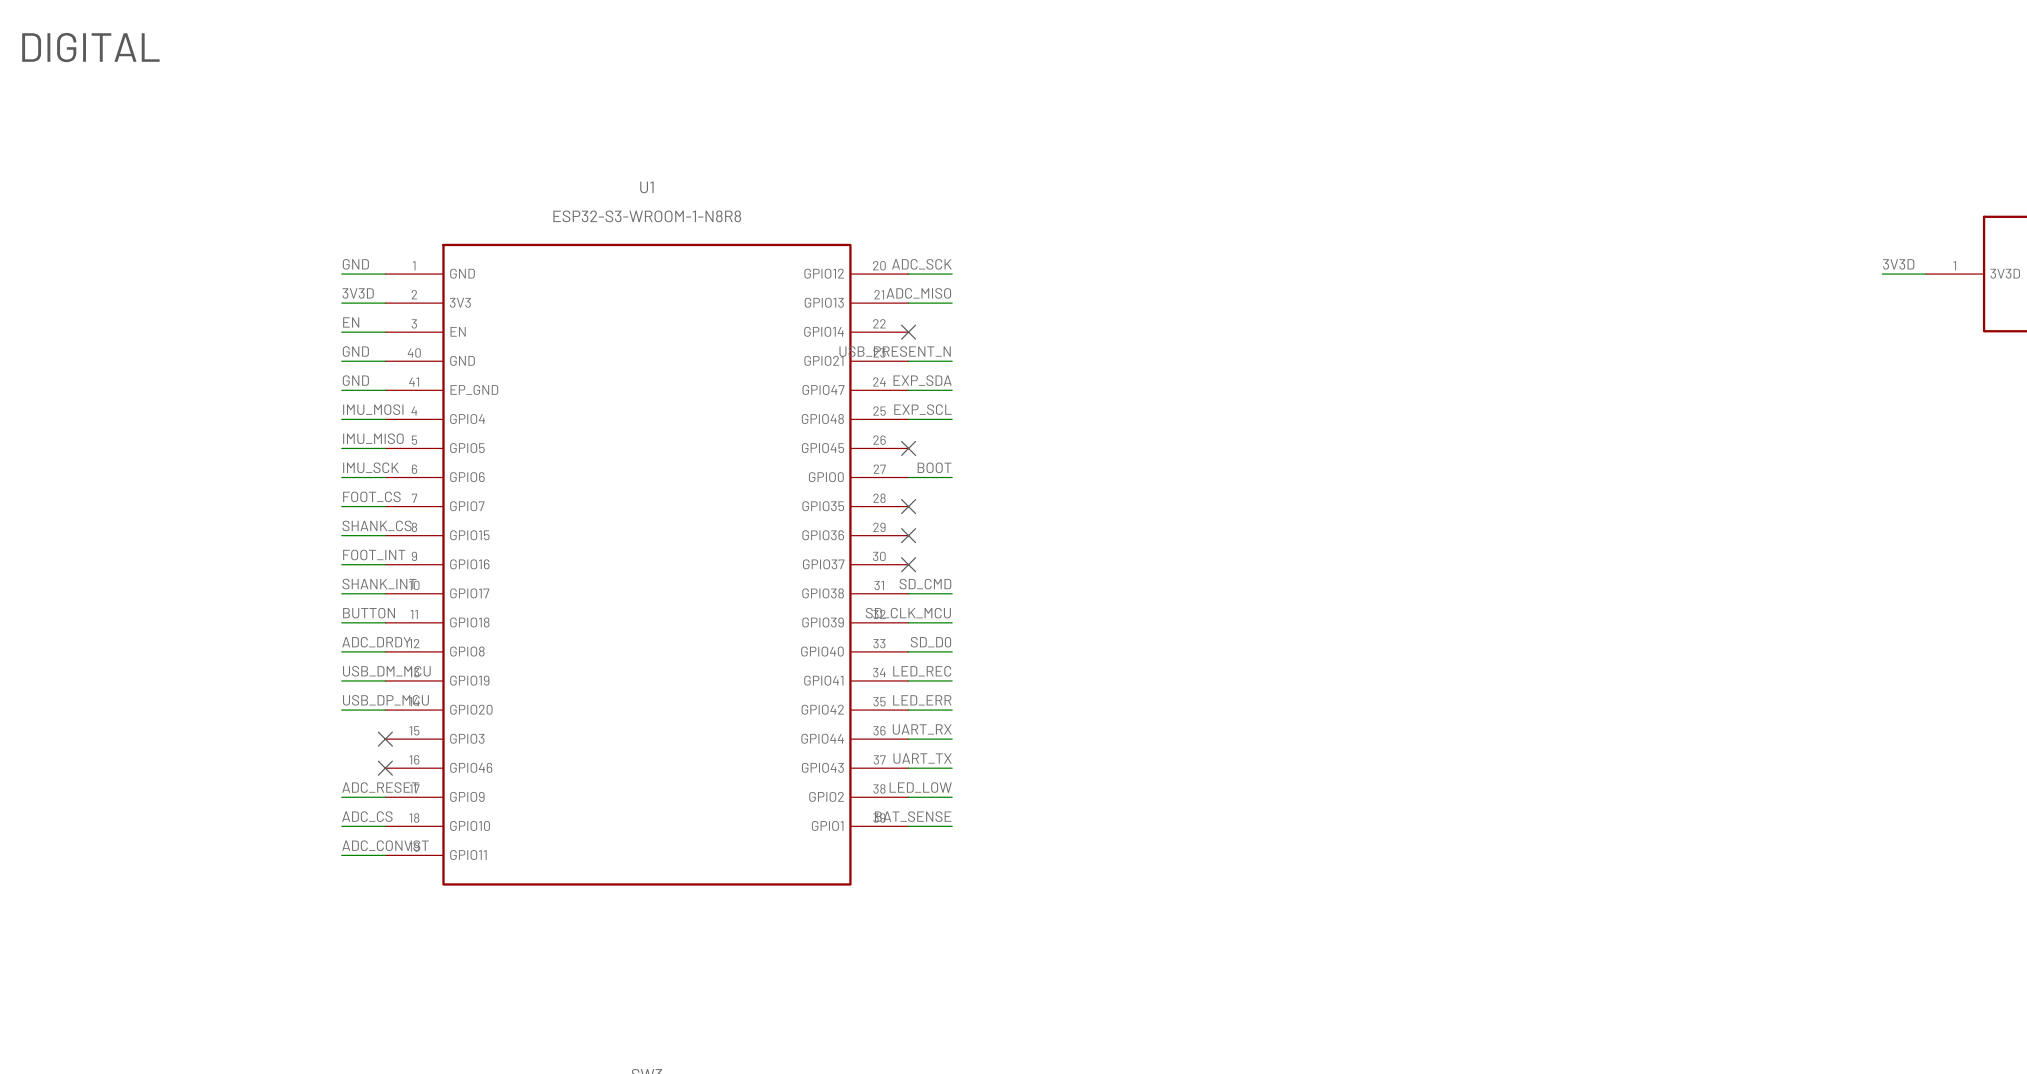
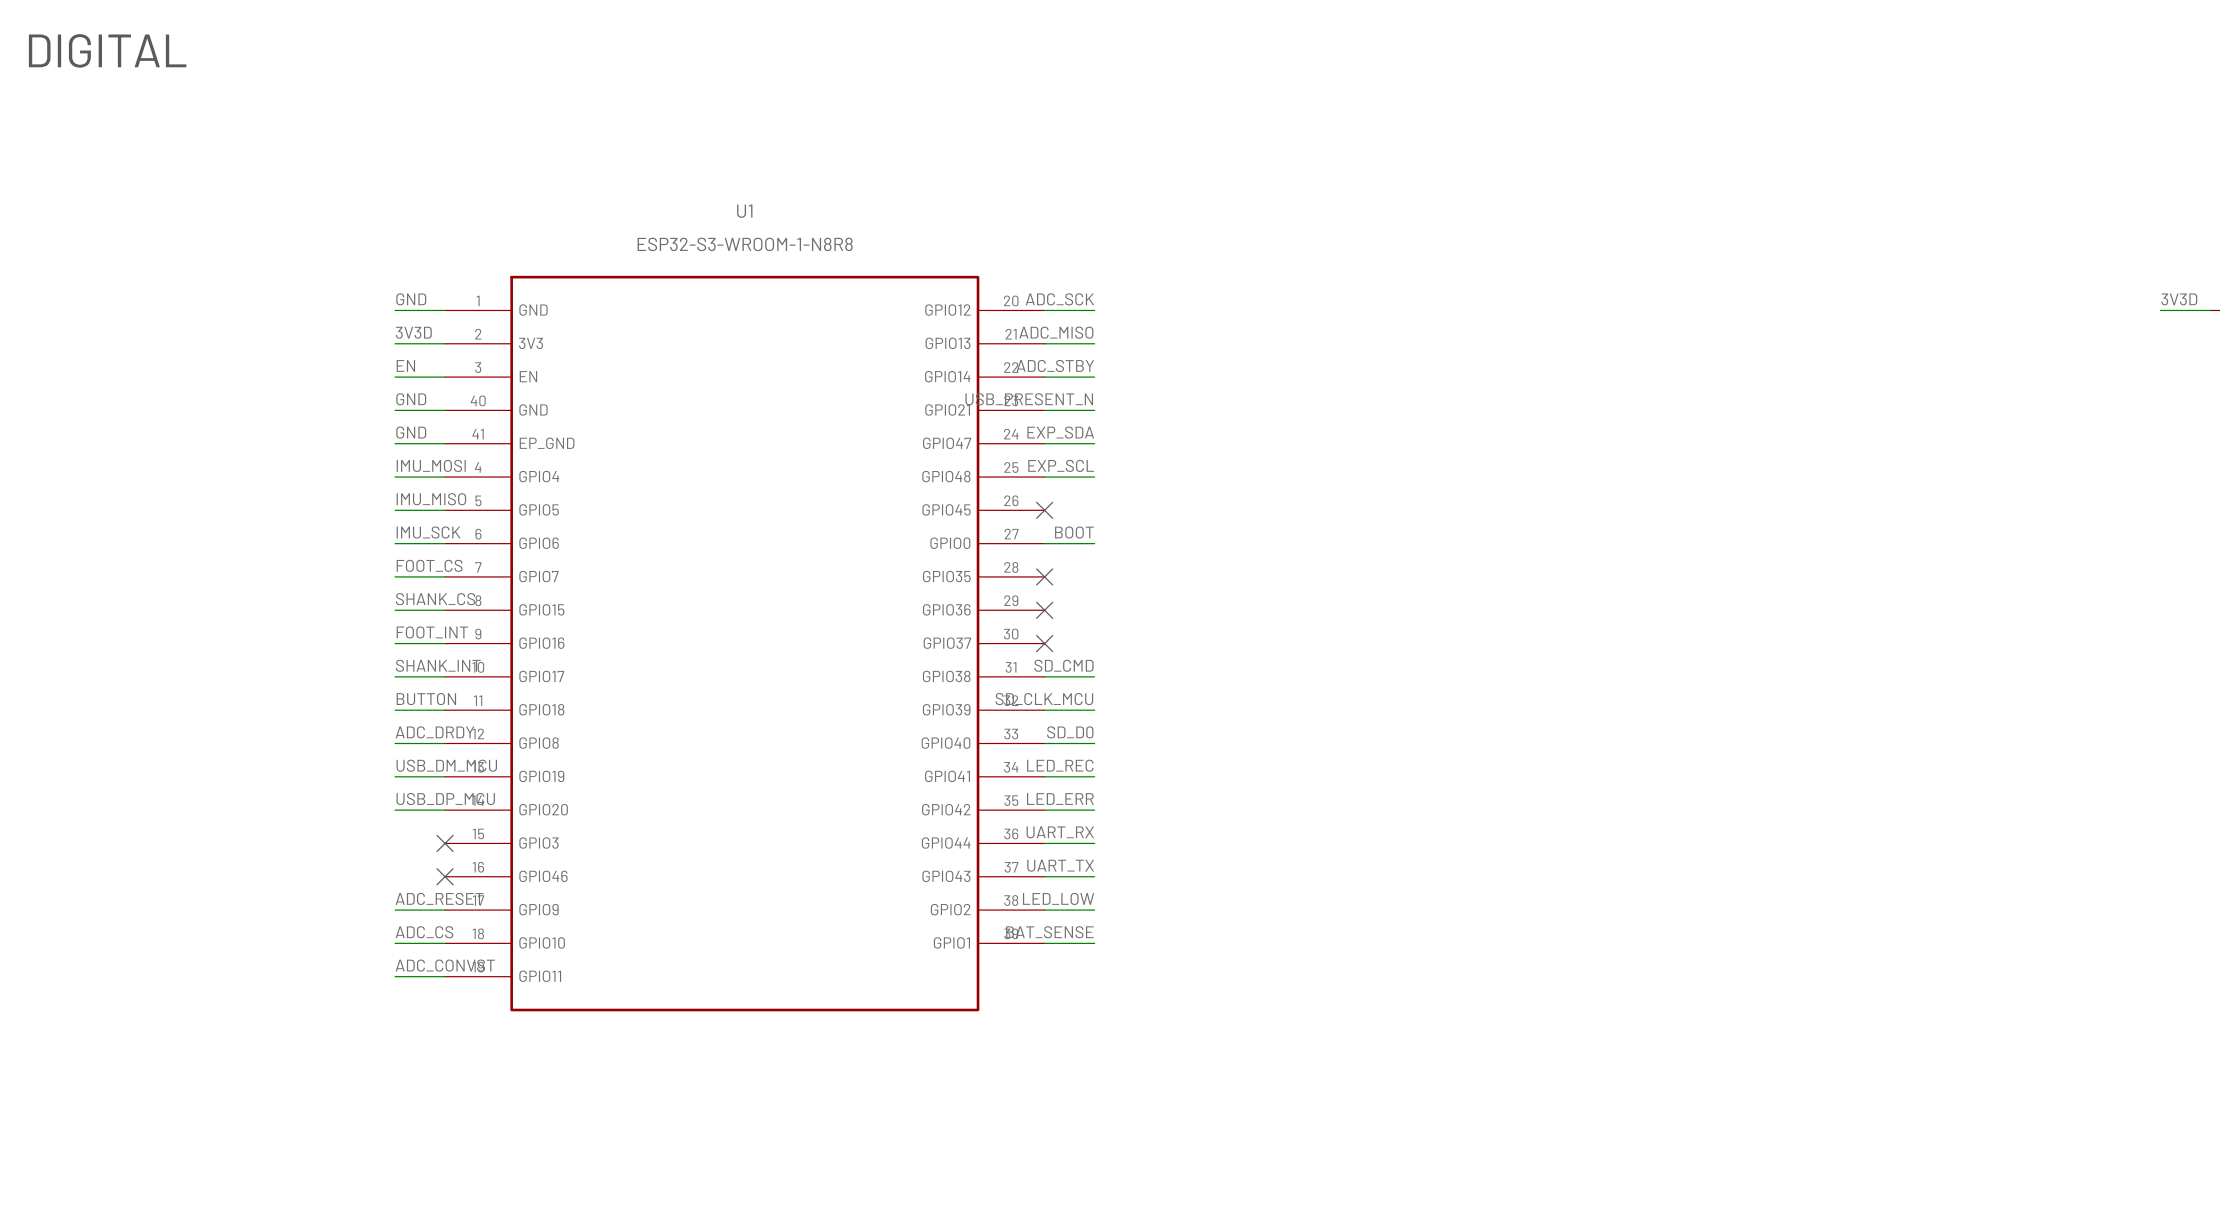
label: none -> ADC_STBY (1055, 365)
wire: none -> (1044, 377) (1094, 377)
no-connect mark: (908, 332) -> none

